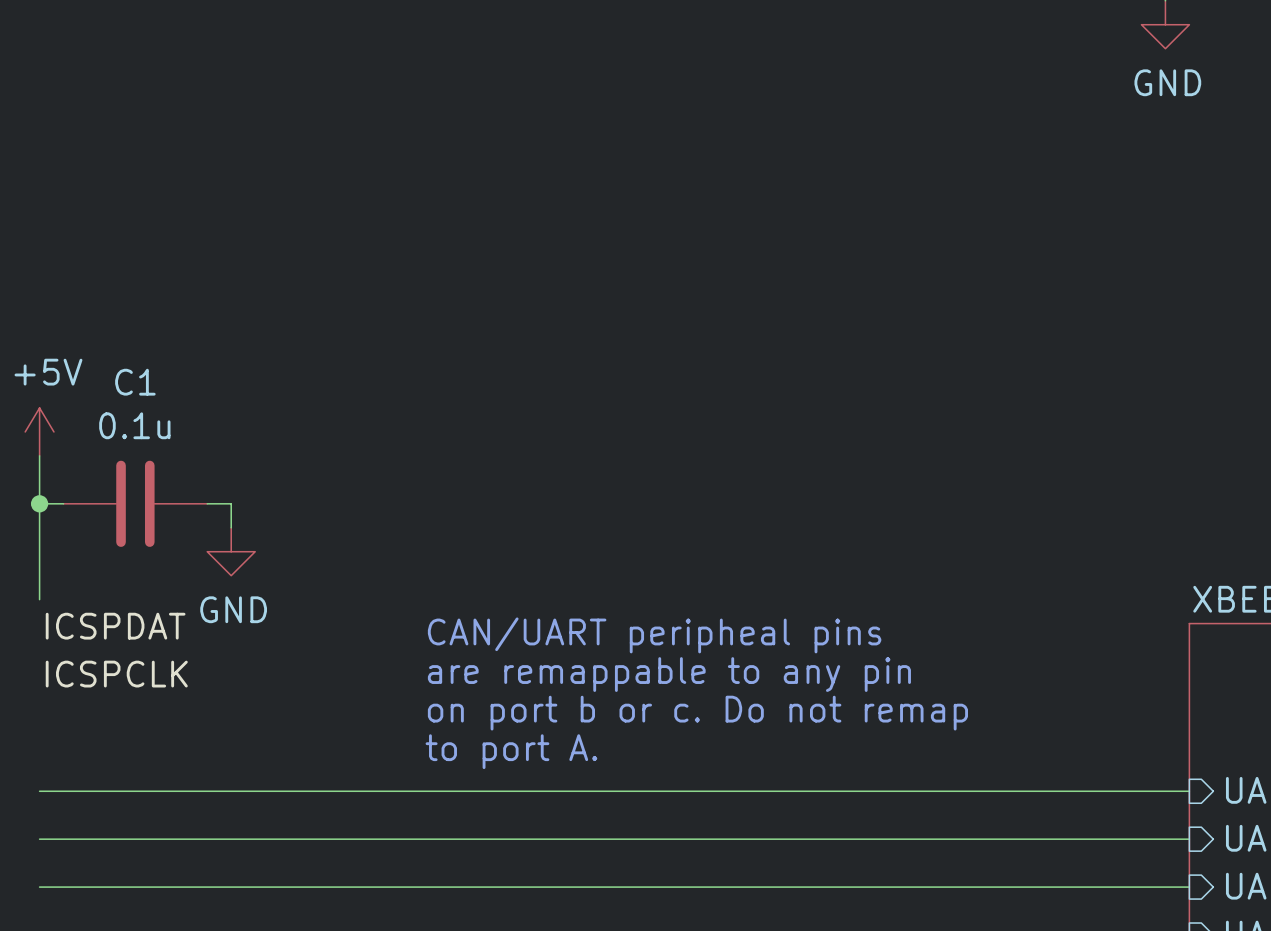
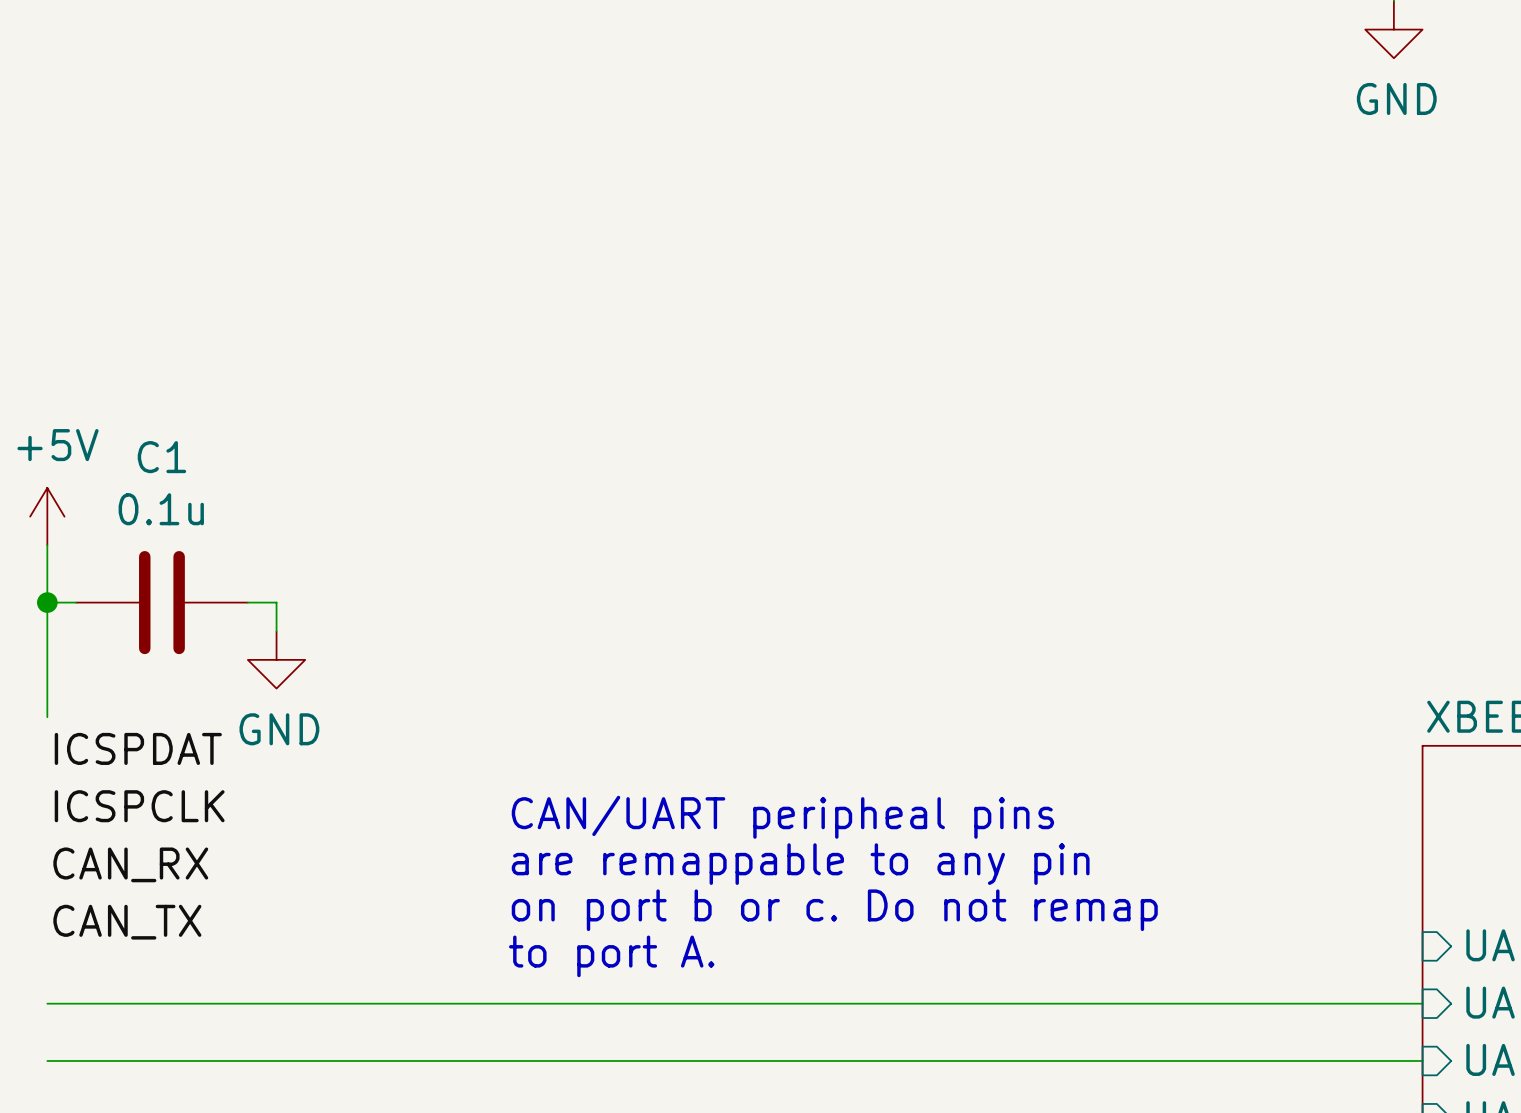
text position: CAN/UART peripheal pins (654, 635) -> CAN/UART peripheal pins (782, 817)
text position: are remappable to any pin (669, 674) -> are remappable to any pin (800, 864)
text position: on port b or c. Do not remap (697, 713) -> on port b or c. Do not remap (834, 910)
label: none -> CAN_RX (130, 864)
text position: to port A. (511, 751) -> to port A. (611, 956)
label: none -> CAN_TX (127, 922)
wire: (39, 791) (1189, 791) -> none

